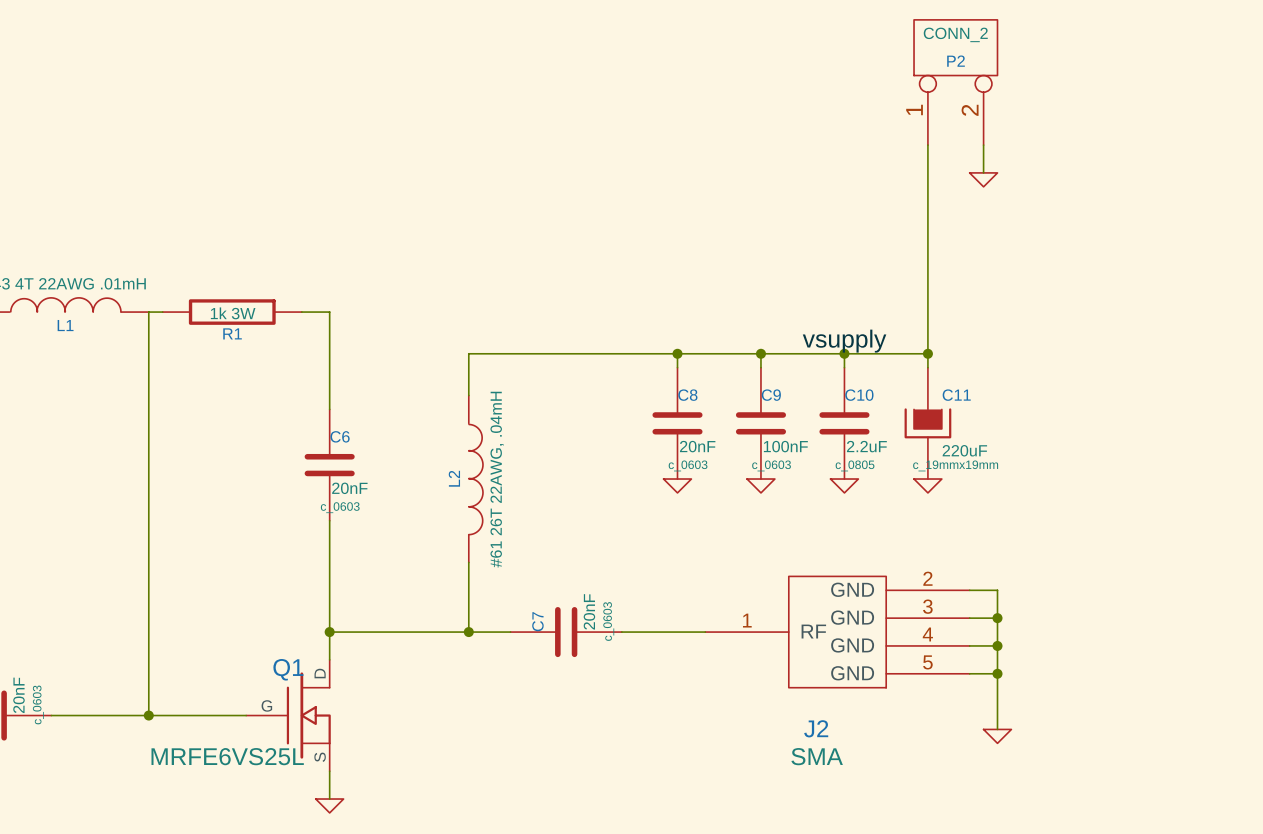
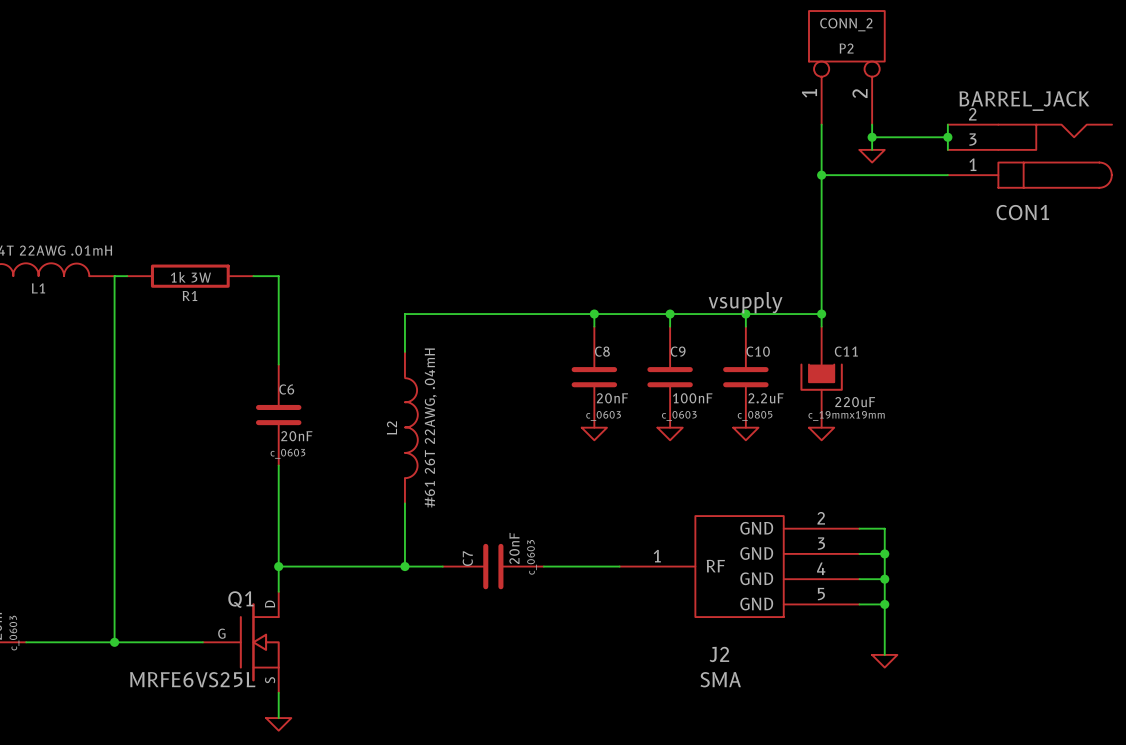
wire: none -> (947, 124) (947, 149)
wire: none -> (872, 137) (947, 137)
junction: none -> (872, 137)
junction: none -> (947, 137)
CON1: none -> BARREL_JACK (1029, 156)
wire: none -> (821, 175) (947, 175)
junction: none -> (821, 175)

